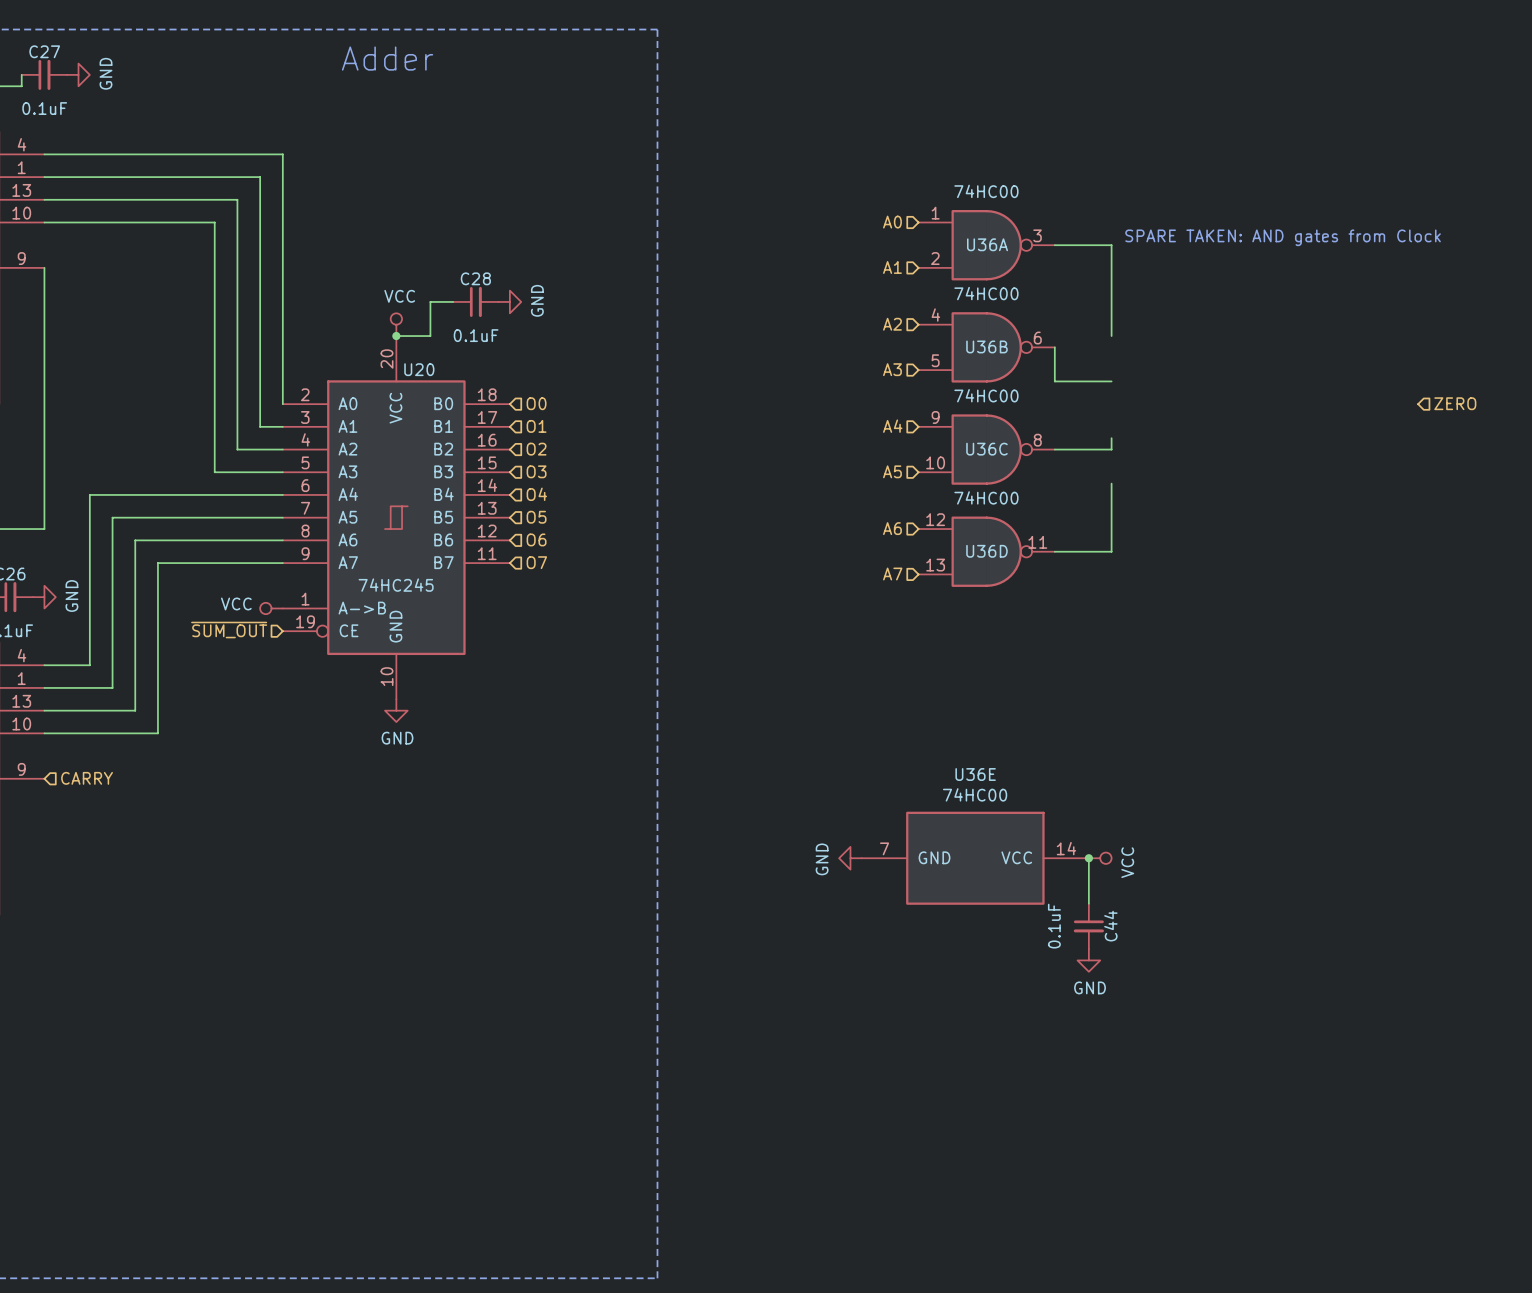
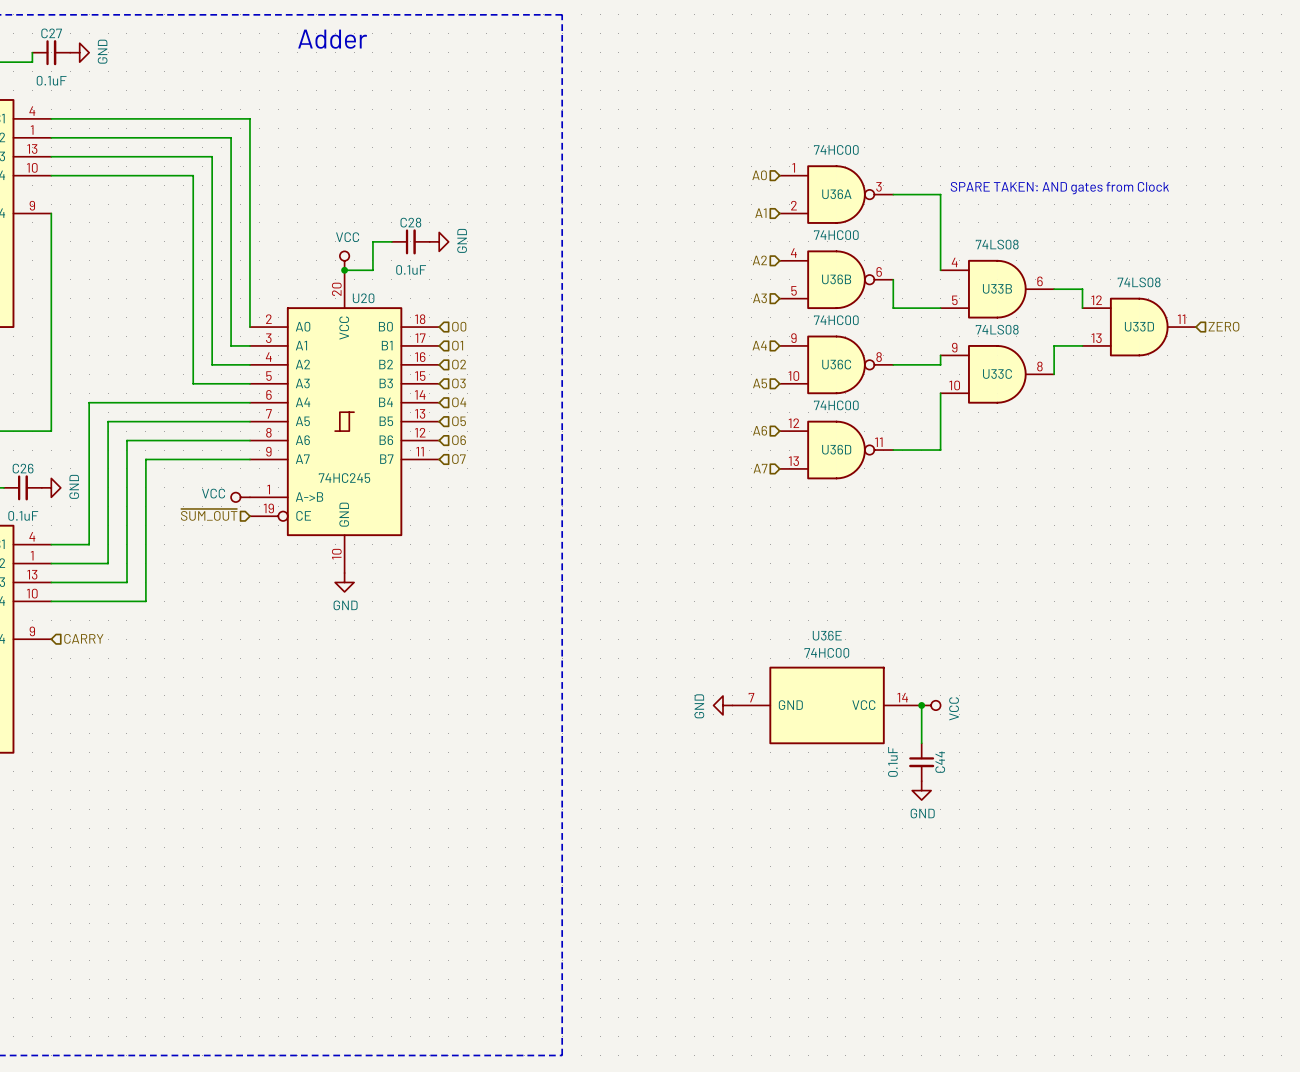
U33B: none -> 74LS08 (997, 289)
wire: none -> (1054, 289) (1082, 289) (1082, 308)
U33D: none -> 74LS08 (1139, 327)
wire: none -> (1082, 345) (1054, 345) (1054, 374)
U33C: none -> 74LS08 (997, 374)

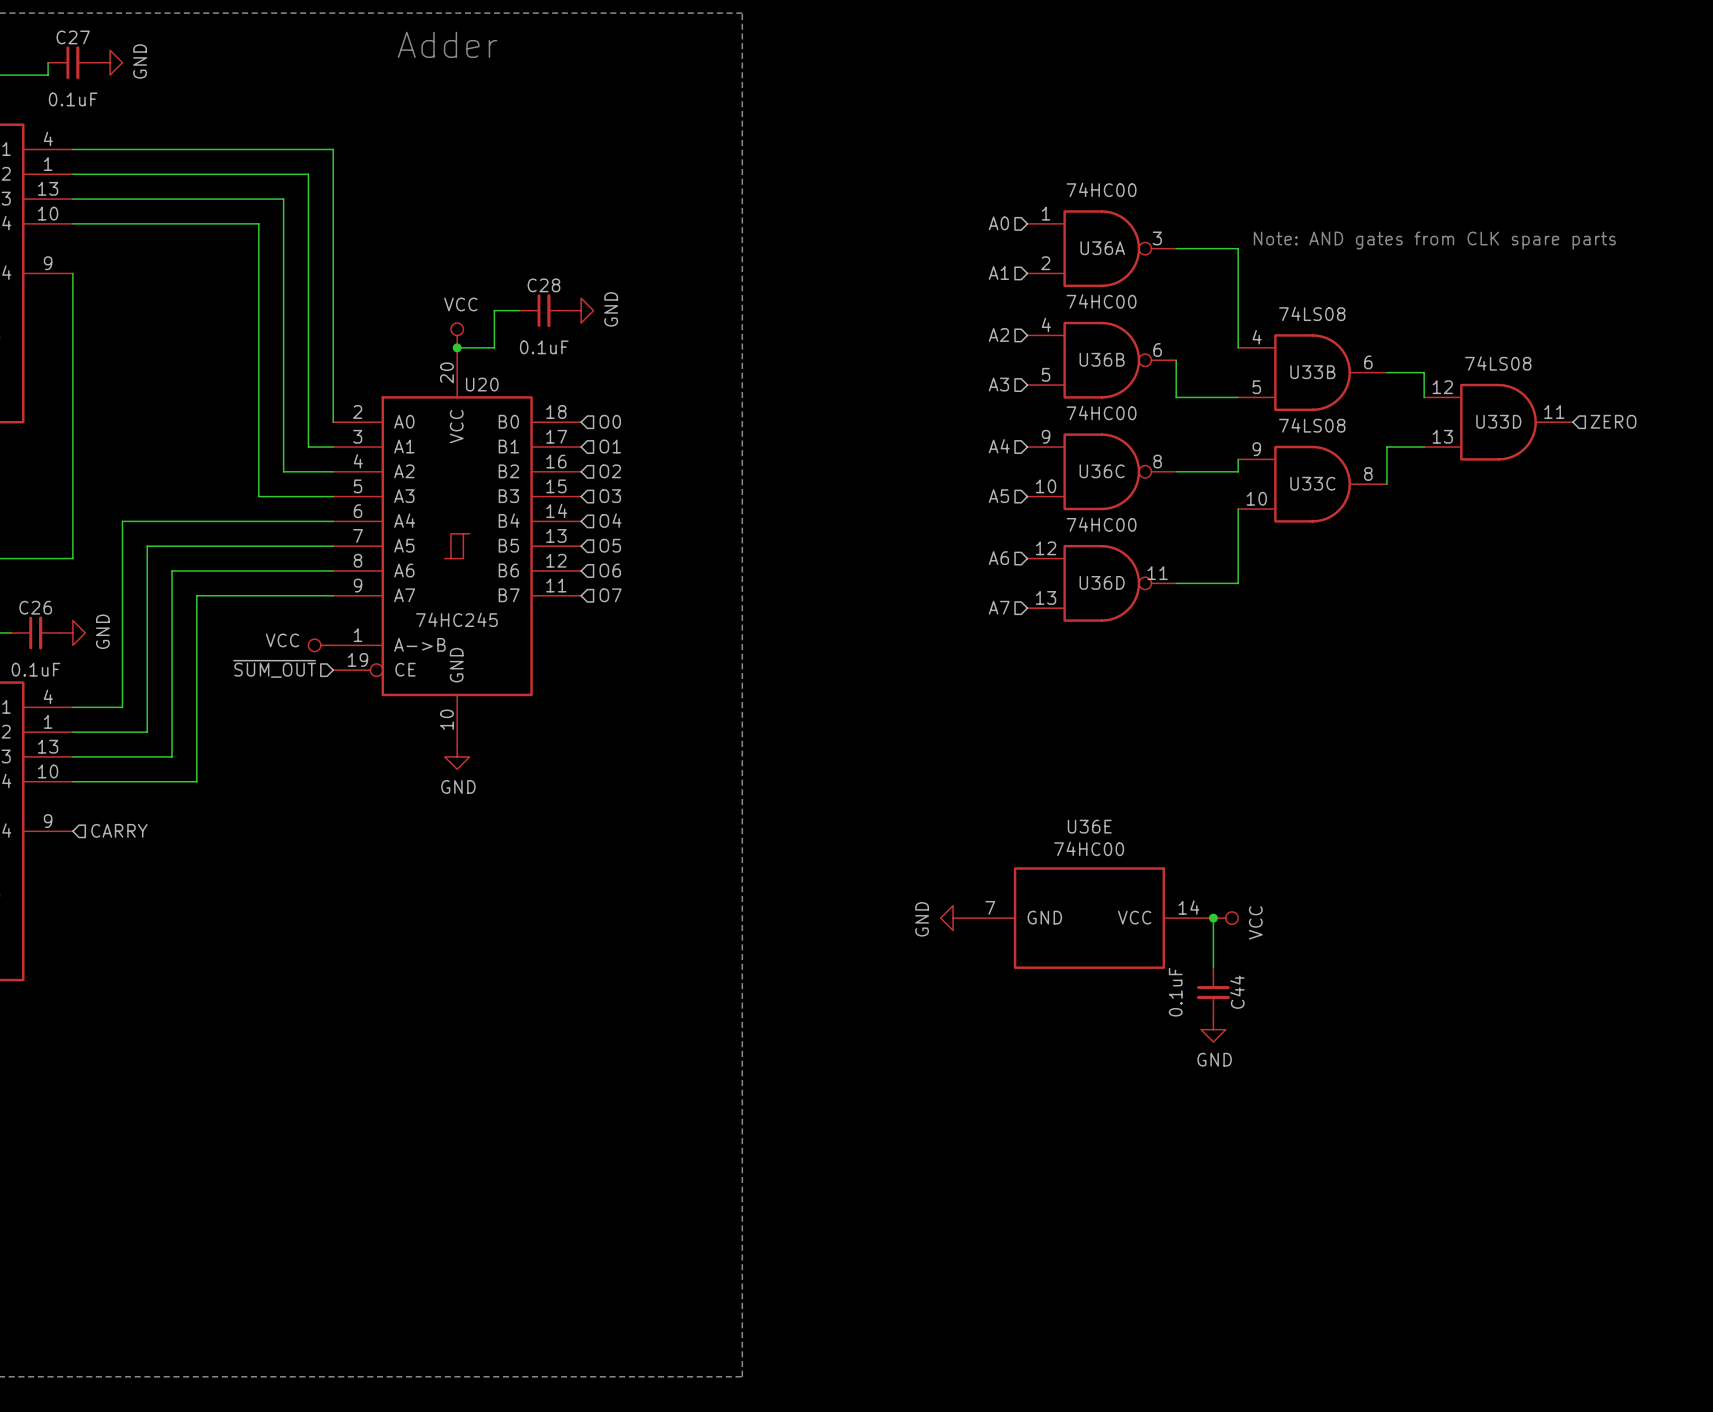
text: SPARE TAKEN: AND gates from Clock (1059, 188) -> Note: AND gates from CLK spare parts (1434, 240)

